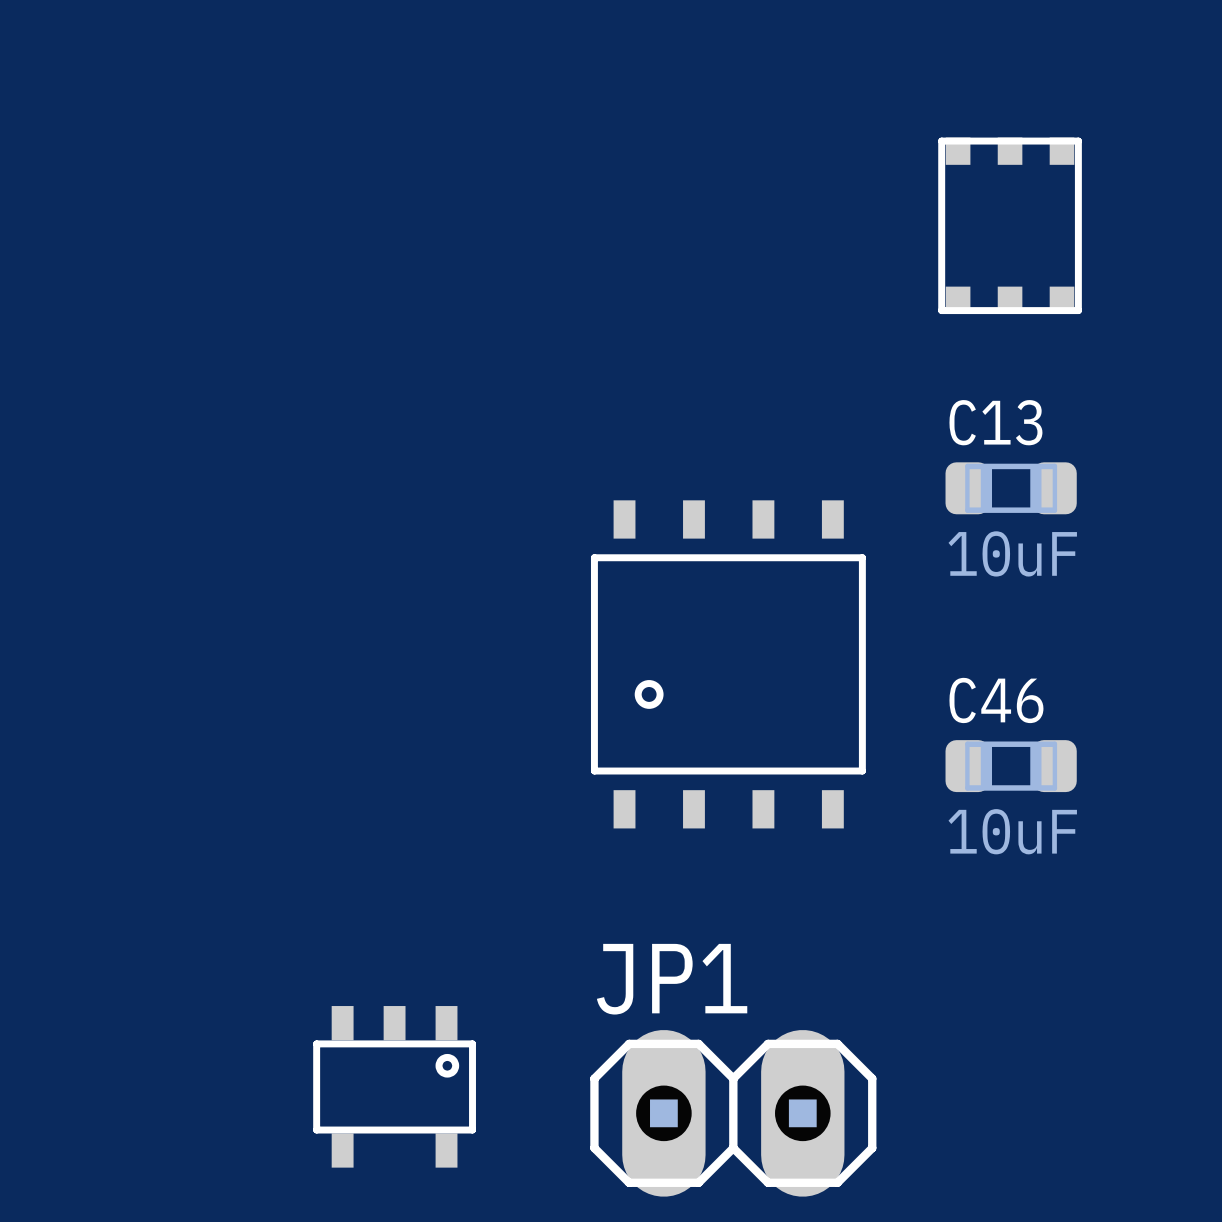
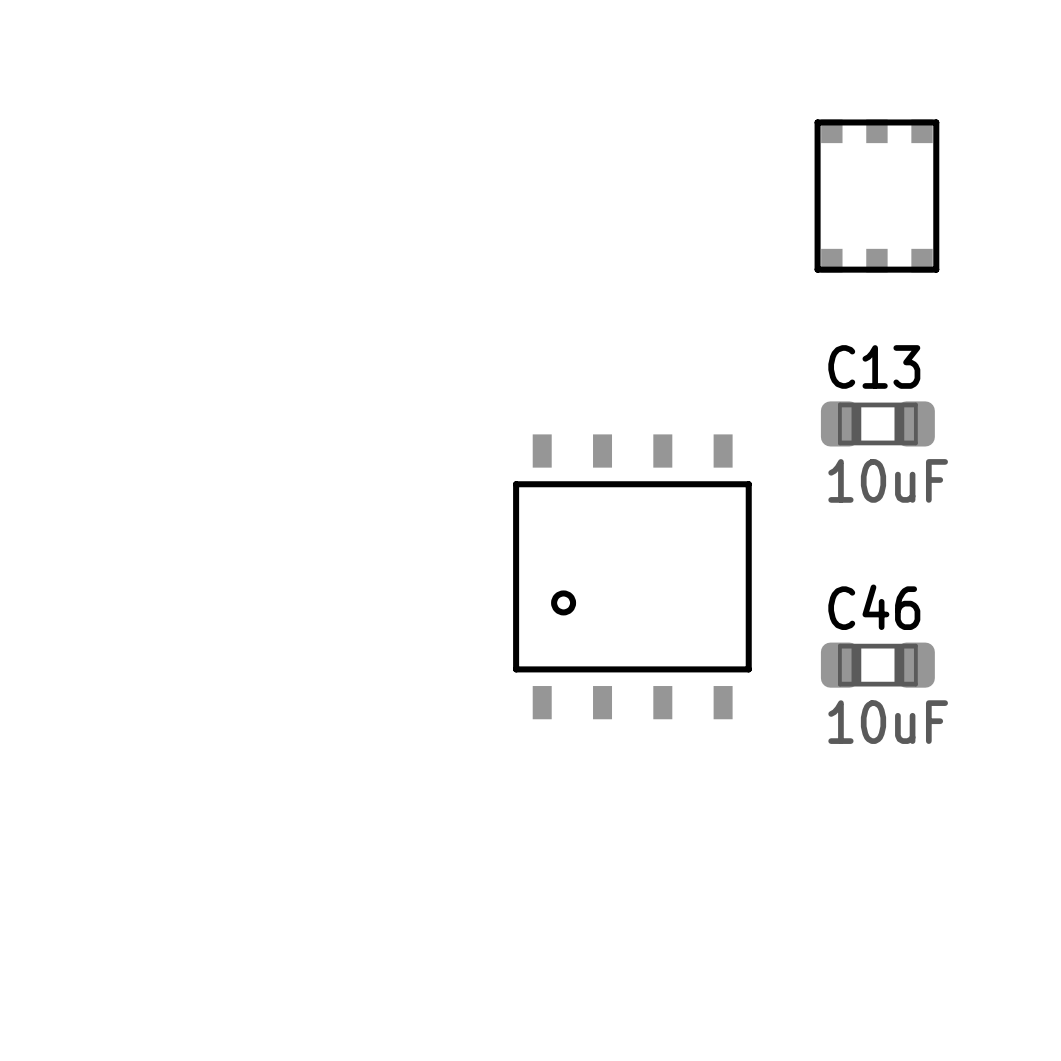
part: (394, 1086) -> none
JP1: (733, 1113) -> none

